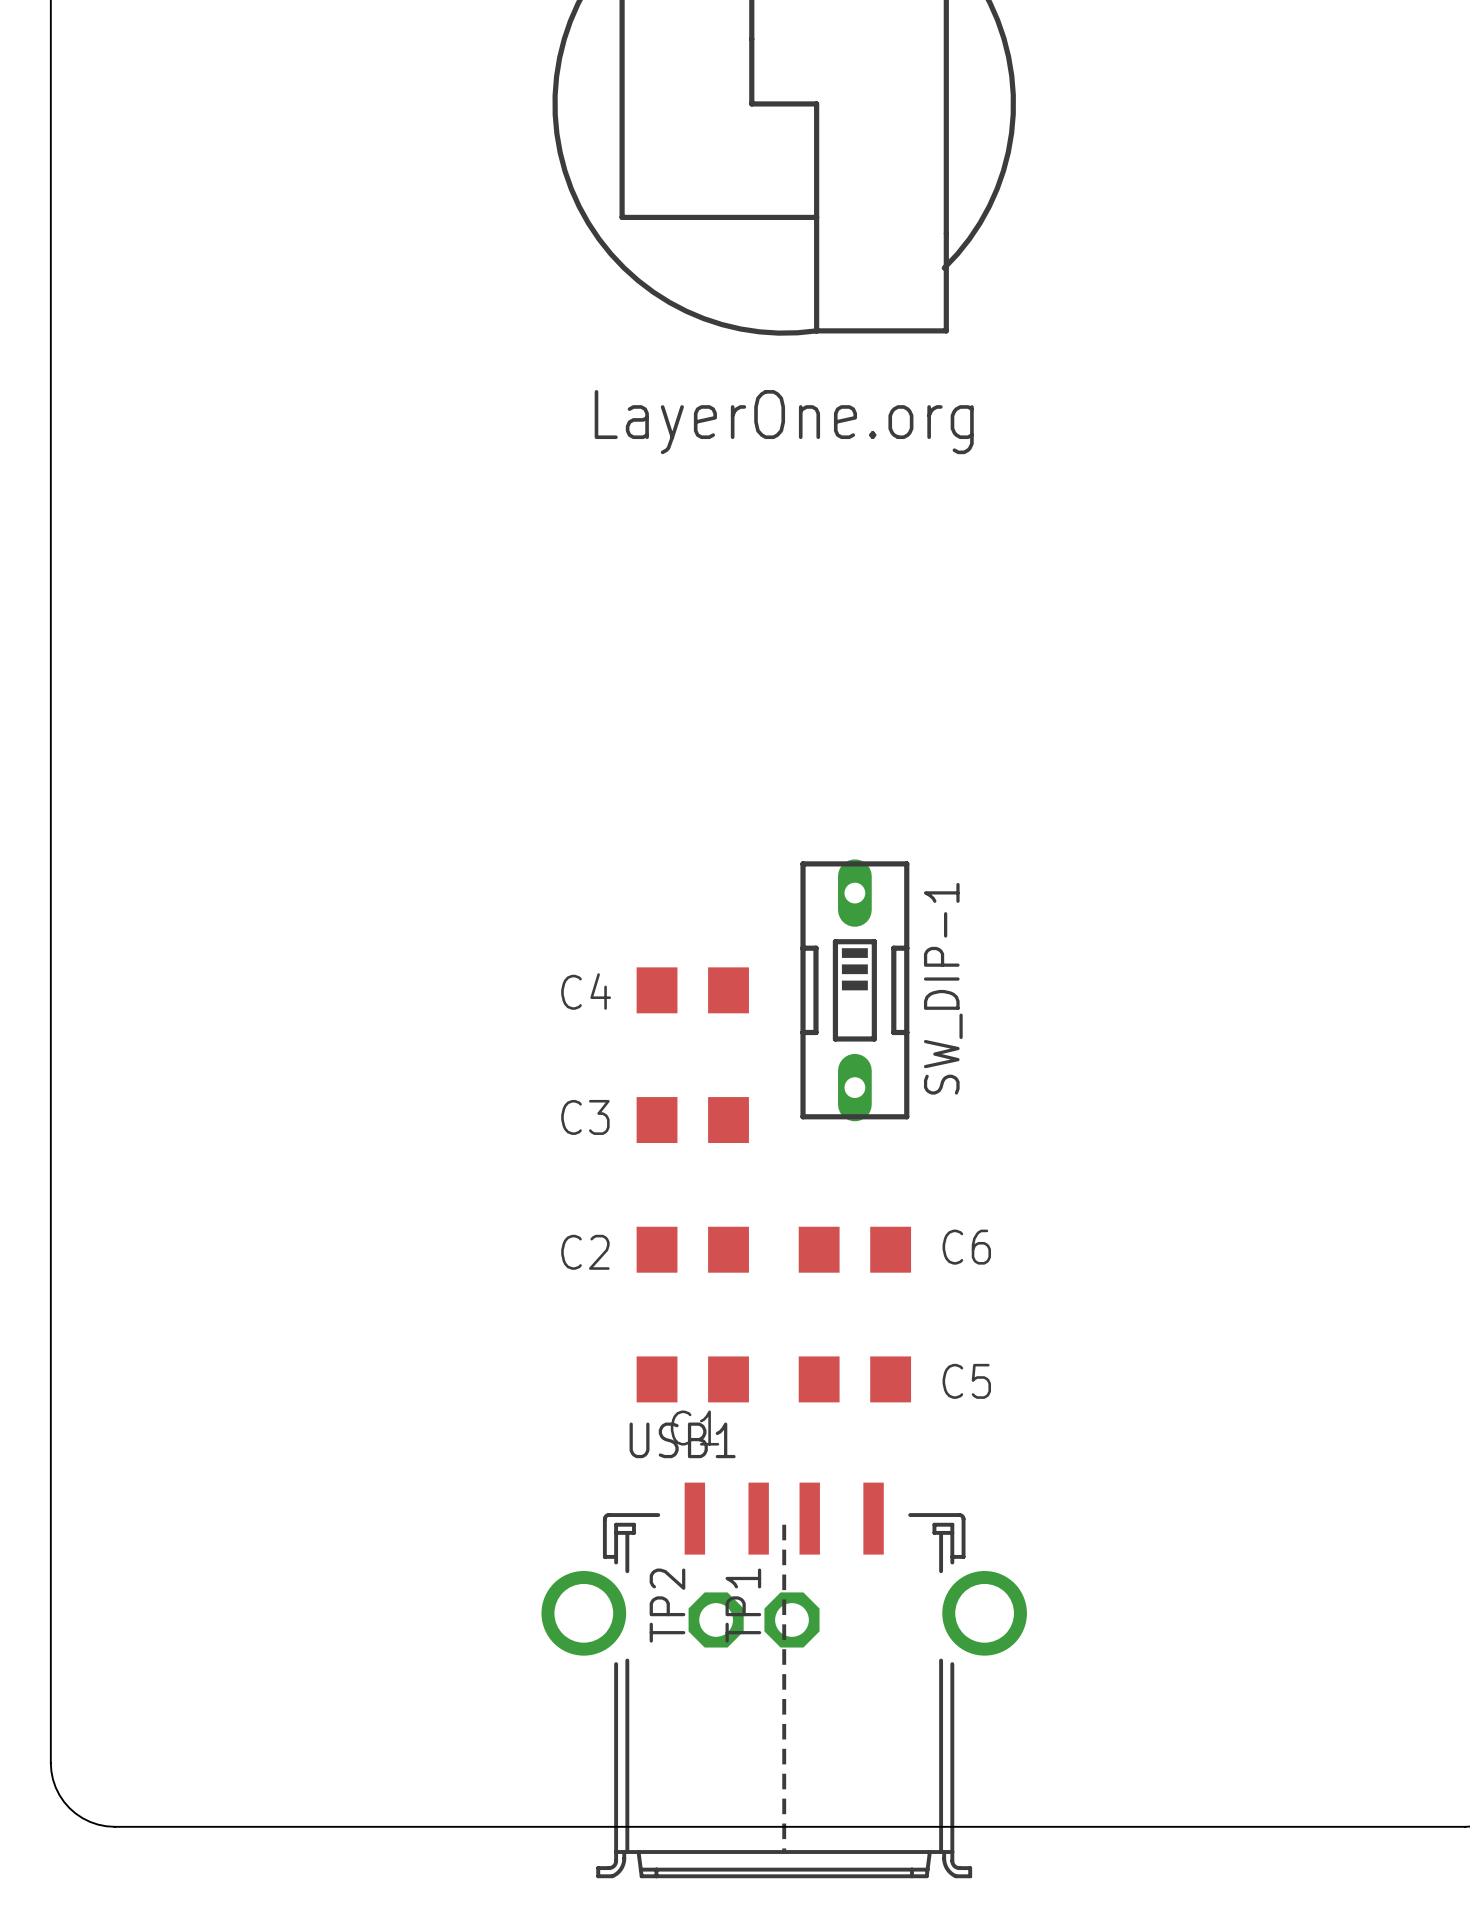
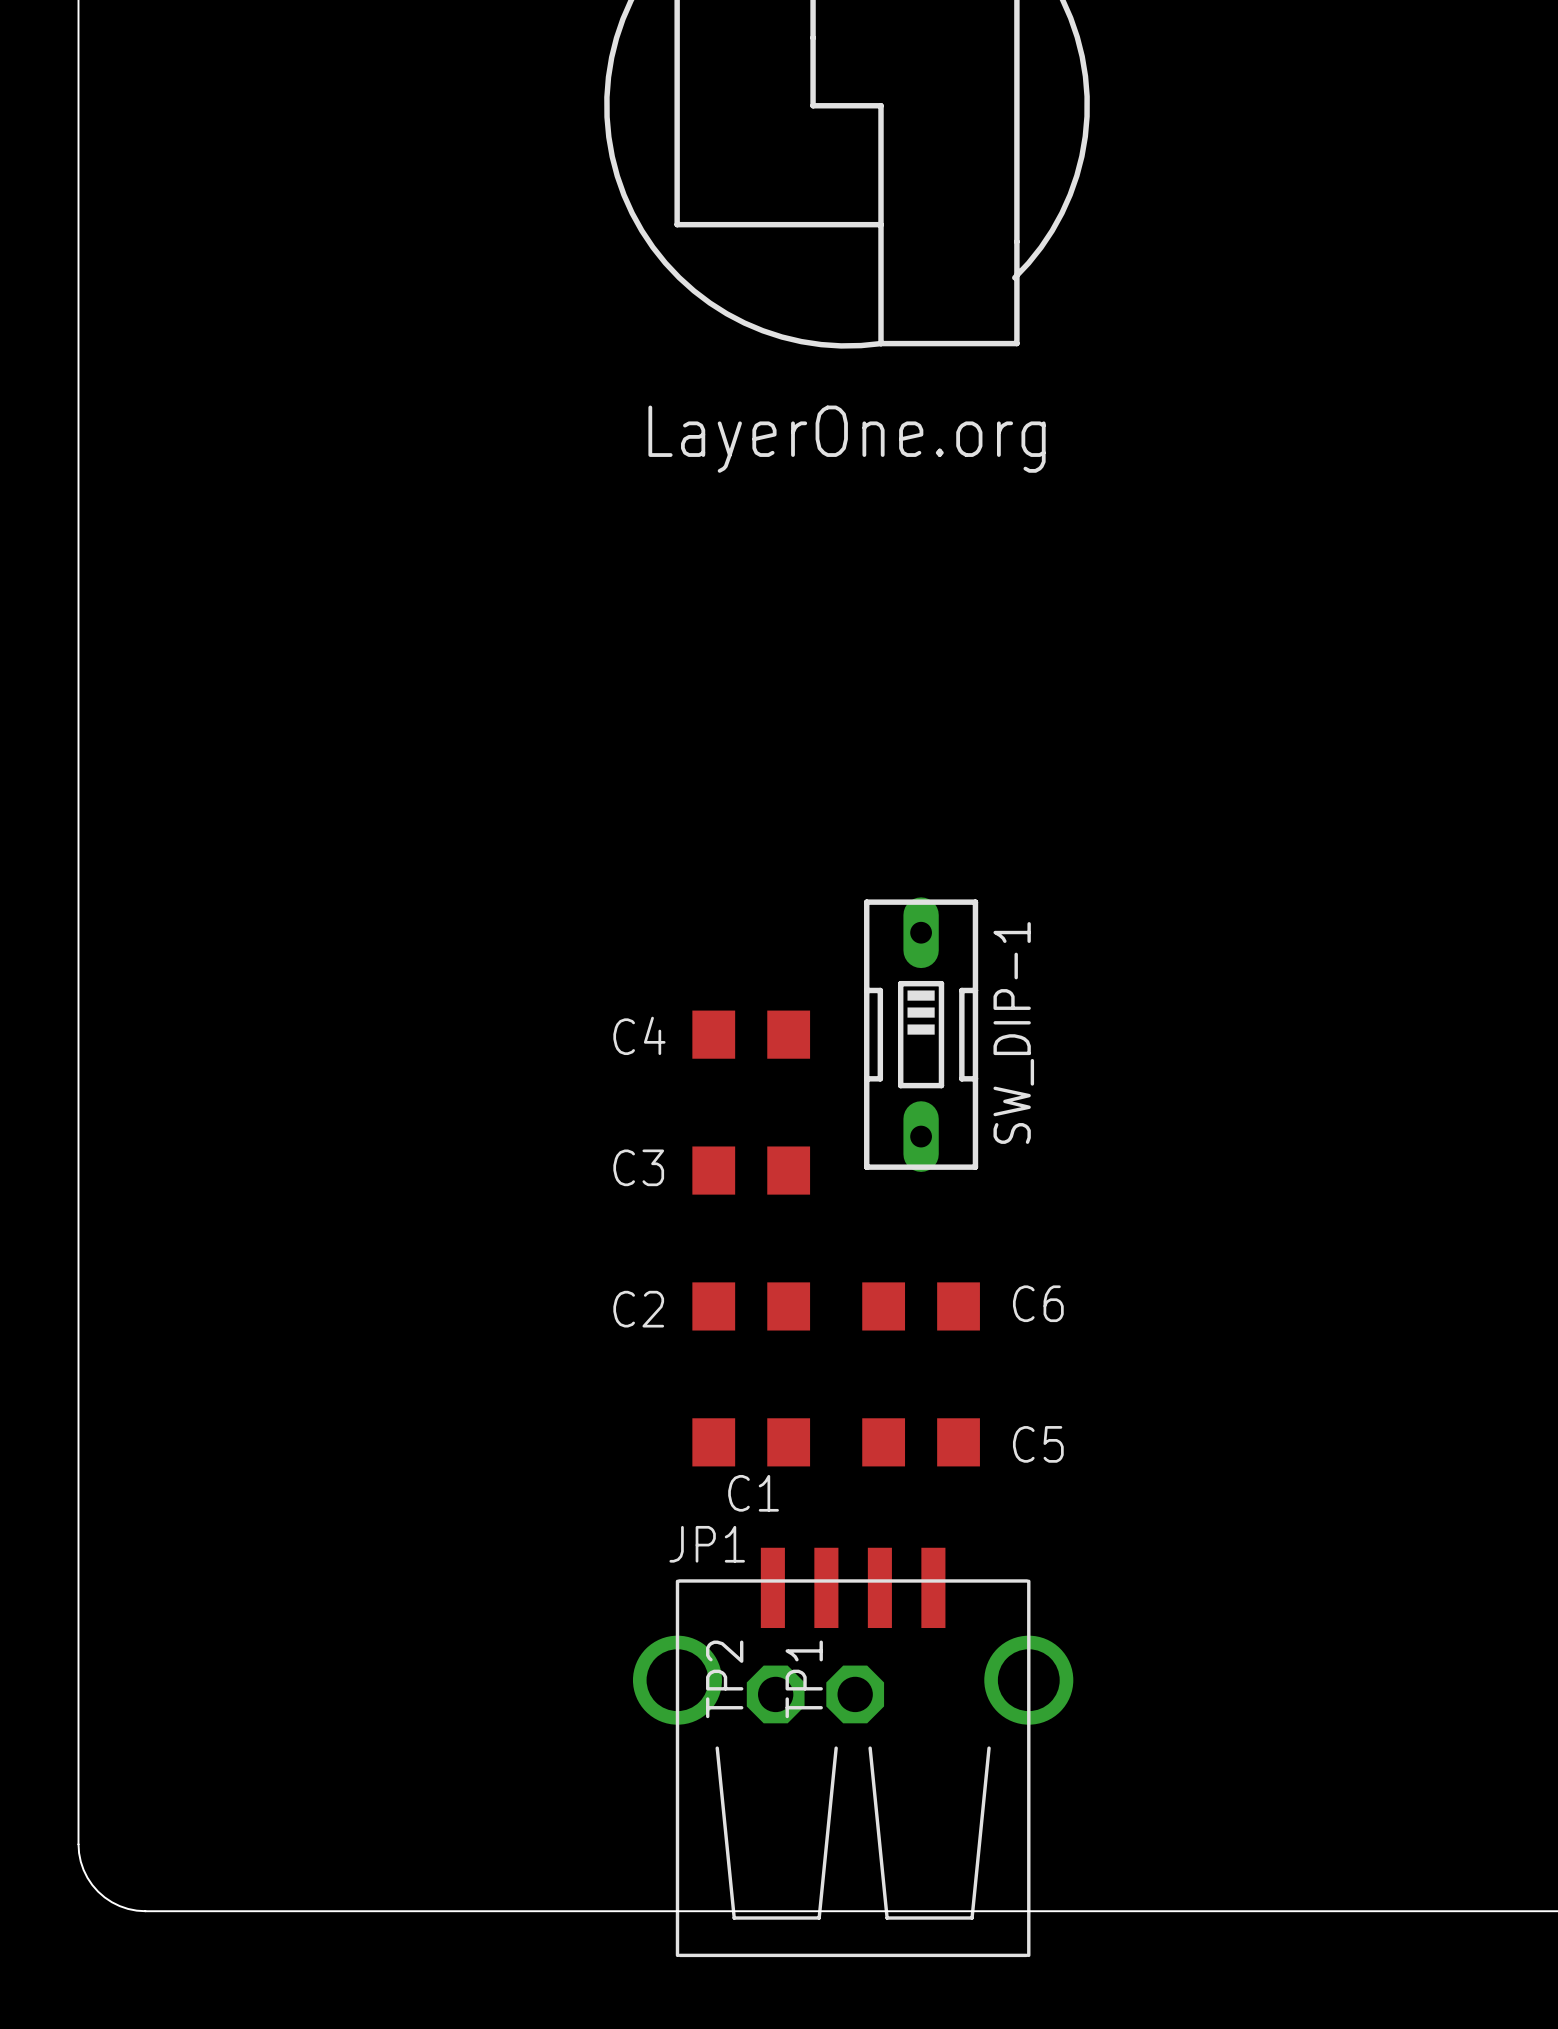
JP1: none -> (853, 1752)
USB1: (784, 1680) -> none

